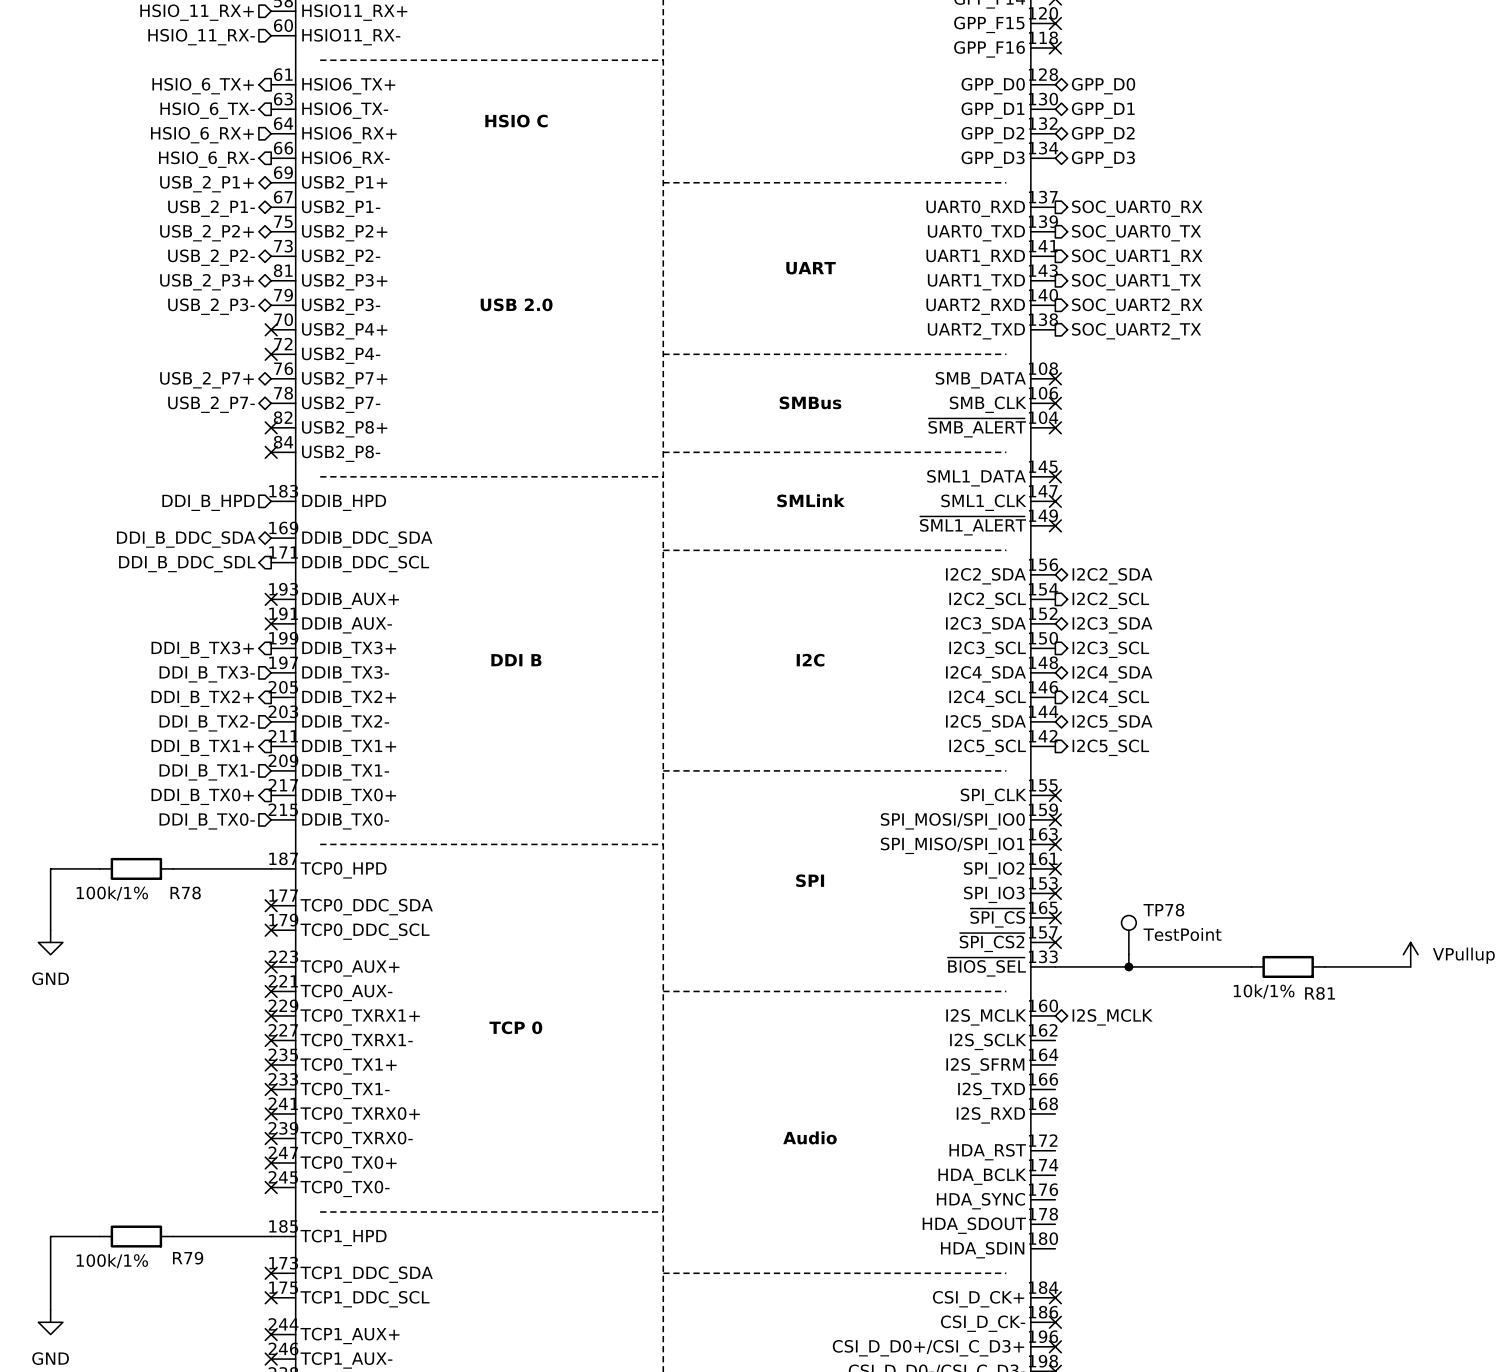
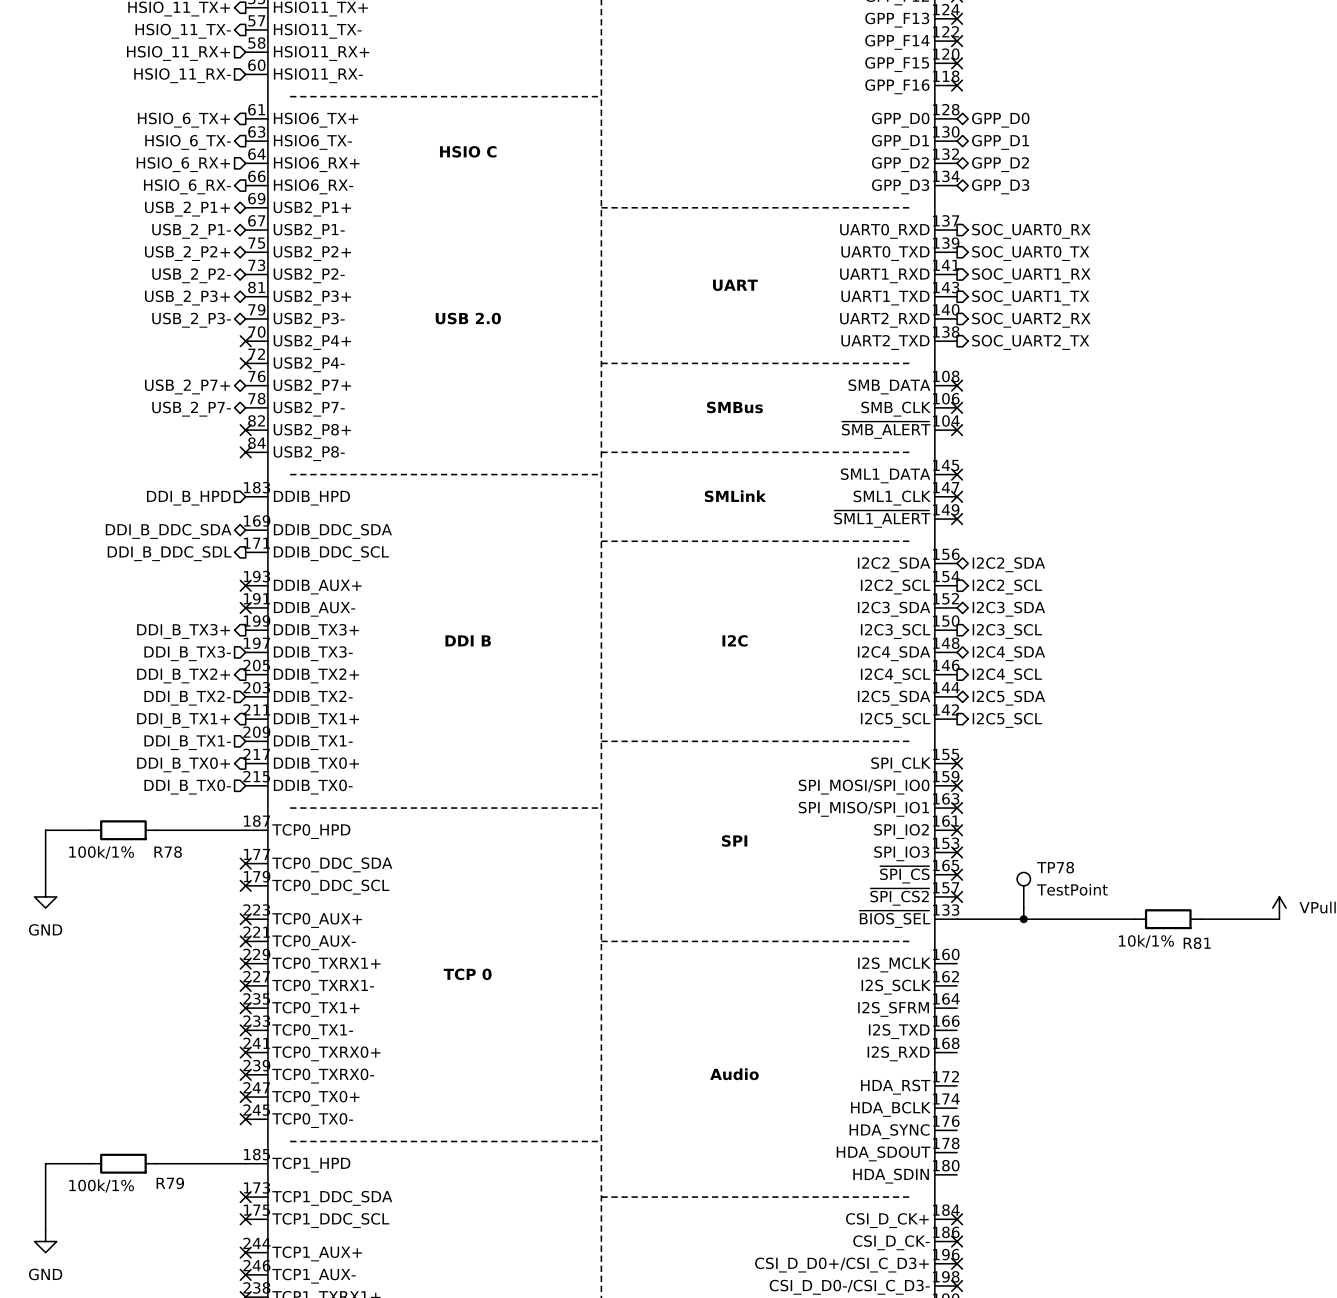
hierarchical label: I2S_MCLK (1112, 1017) -> none

